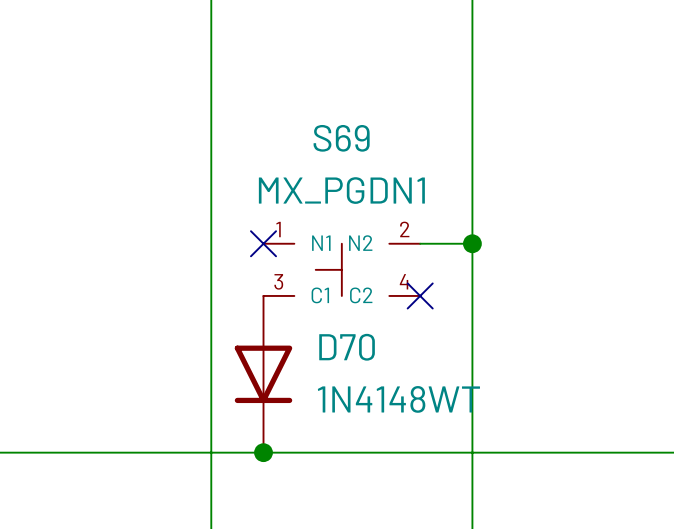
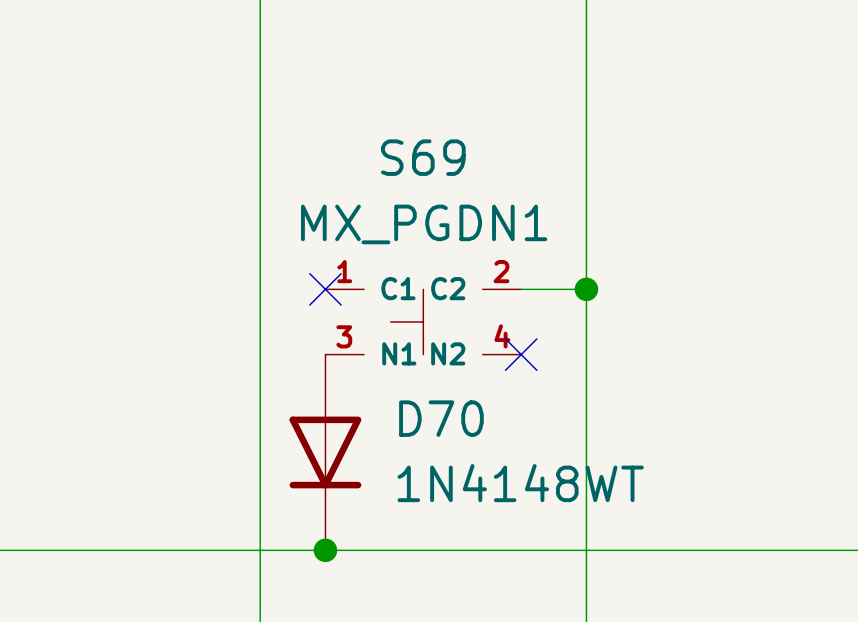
S69 pin name: N1 (321, 243) -> C1 (398, 288)
S69 pin name: N2 (360, 243) -> C2 (448, 288)
S69 pin name: C1 (320, 295) -> N1 (399, 353)
S69 pin name: C2 (361, 295) -> N2 (448, 353)

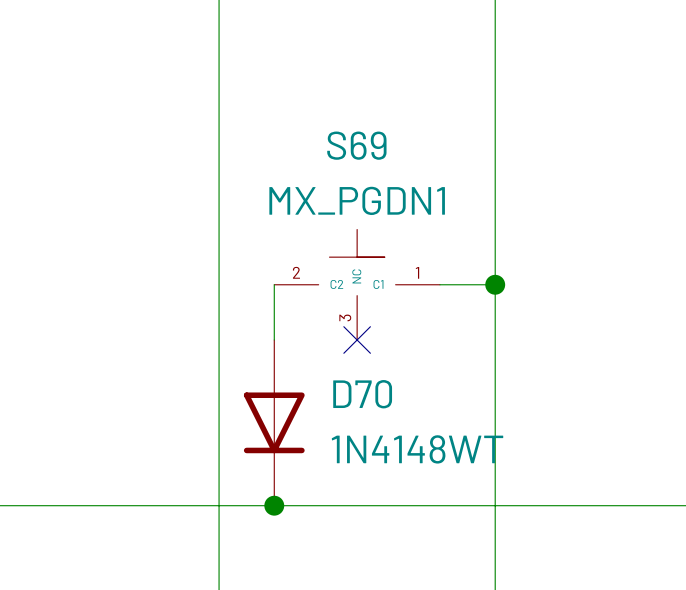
wire: none -> (274, 284) (274, 340)
no-connect mark: (325, 289) -> none
S69 symbol: [325, 289, 522, 355] -> [274, 229, 440, 341]
no-connect mark: none -> (357, 340)
no-connect mark: (521, 354) -> none

